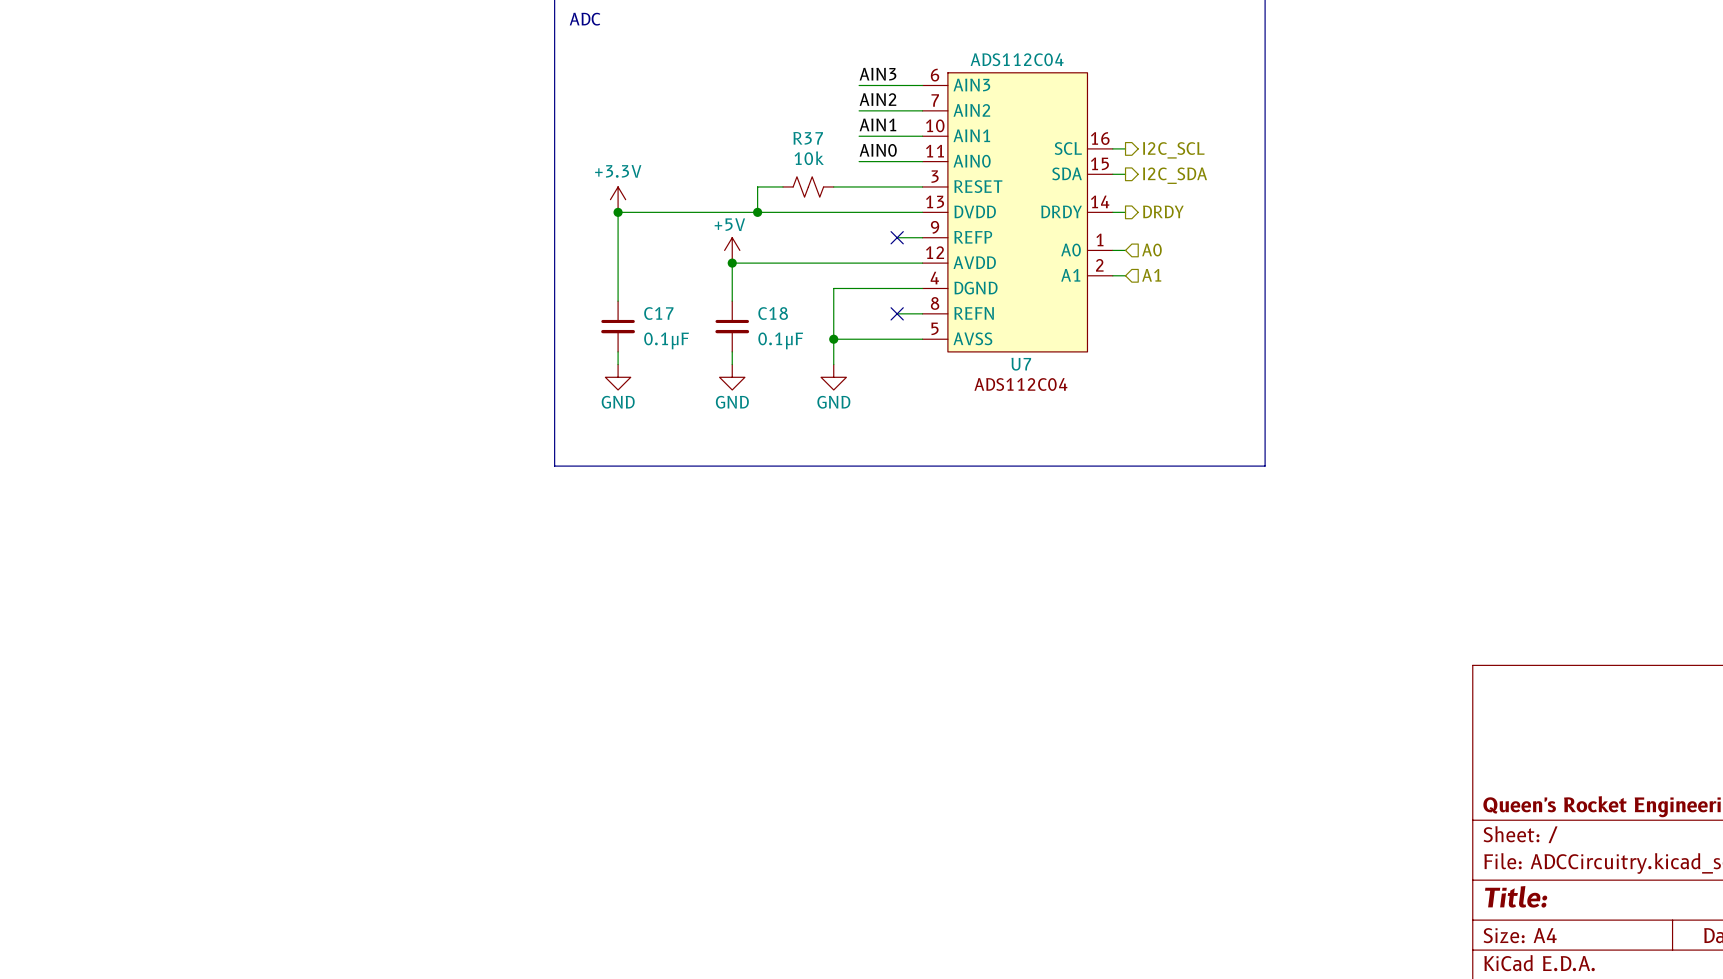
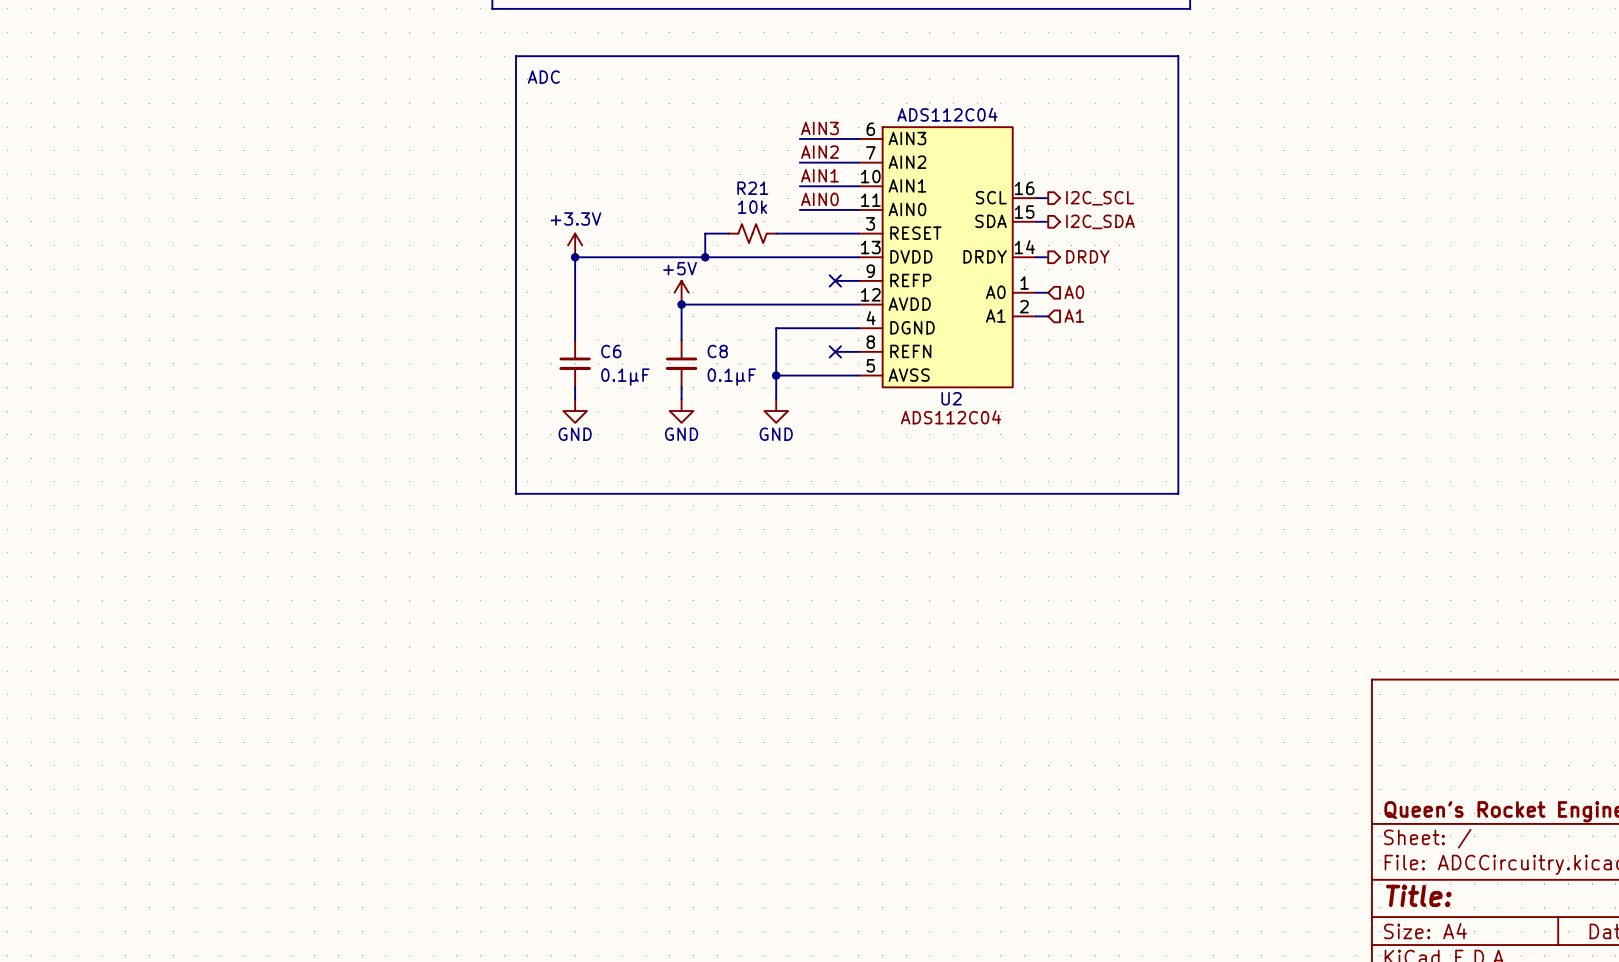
R37 name: R37 (808, 138) -> R21 (752, 188)
C17 name: C17 (658, 313) -> C6 (611, 351)
C18 name: C18 (773, 313) -> C8 (717, 351)
U7 name: U7 (1021, 364) -> U2 (951, 398)

